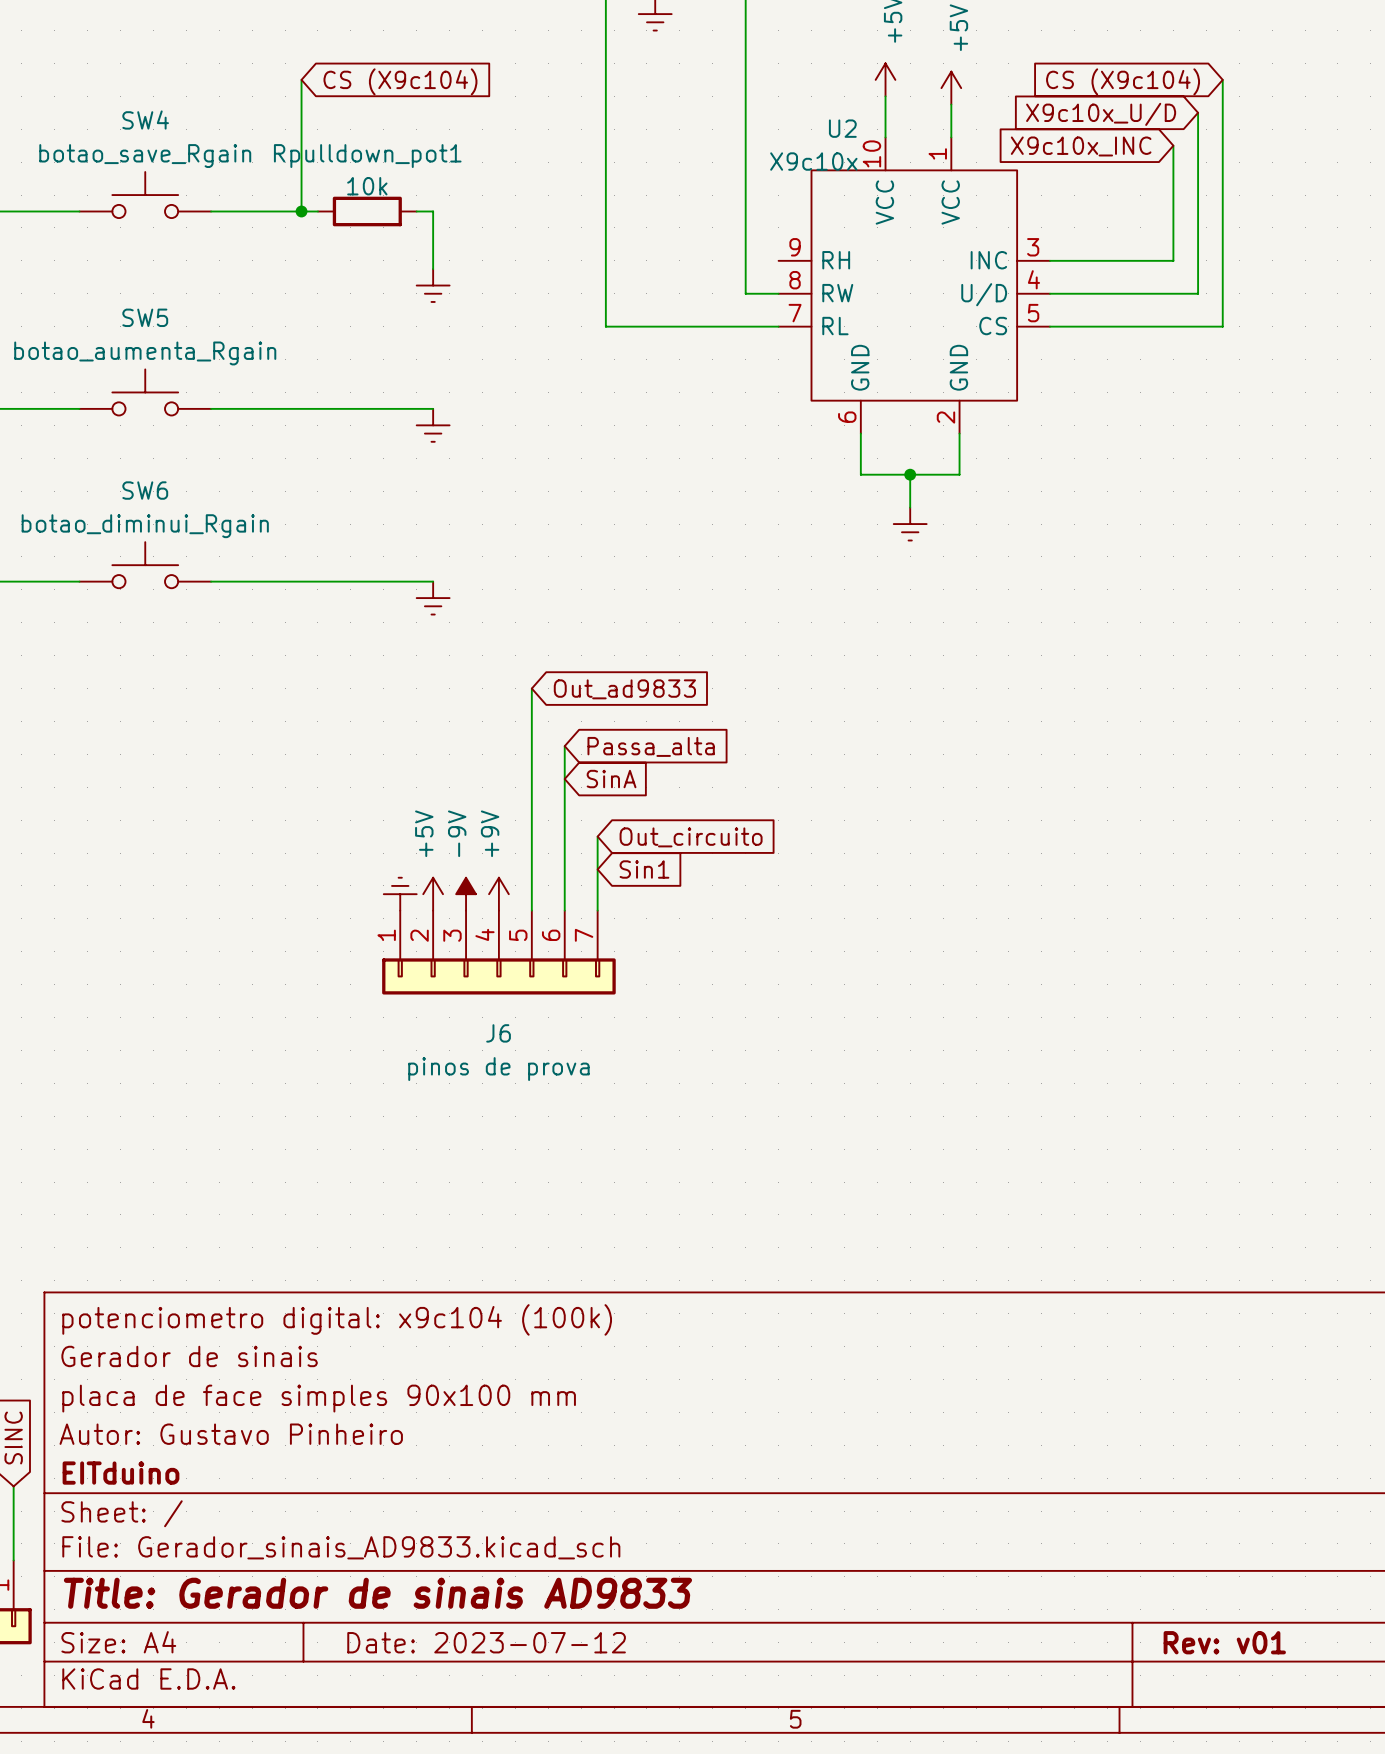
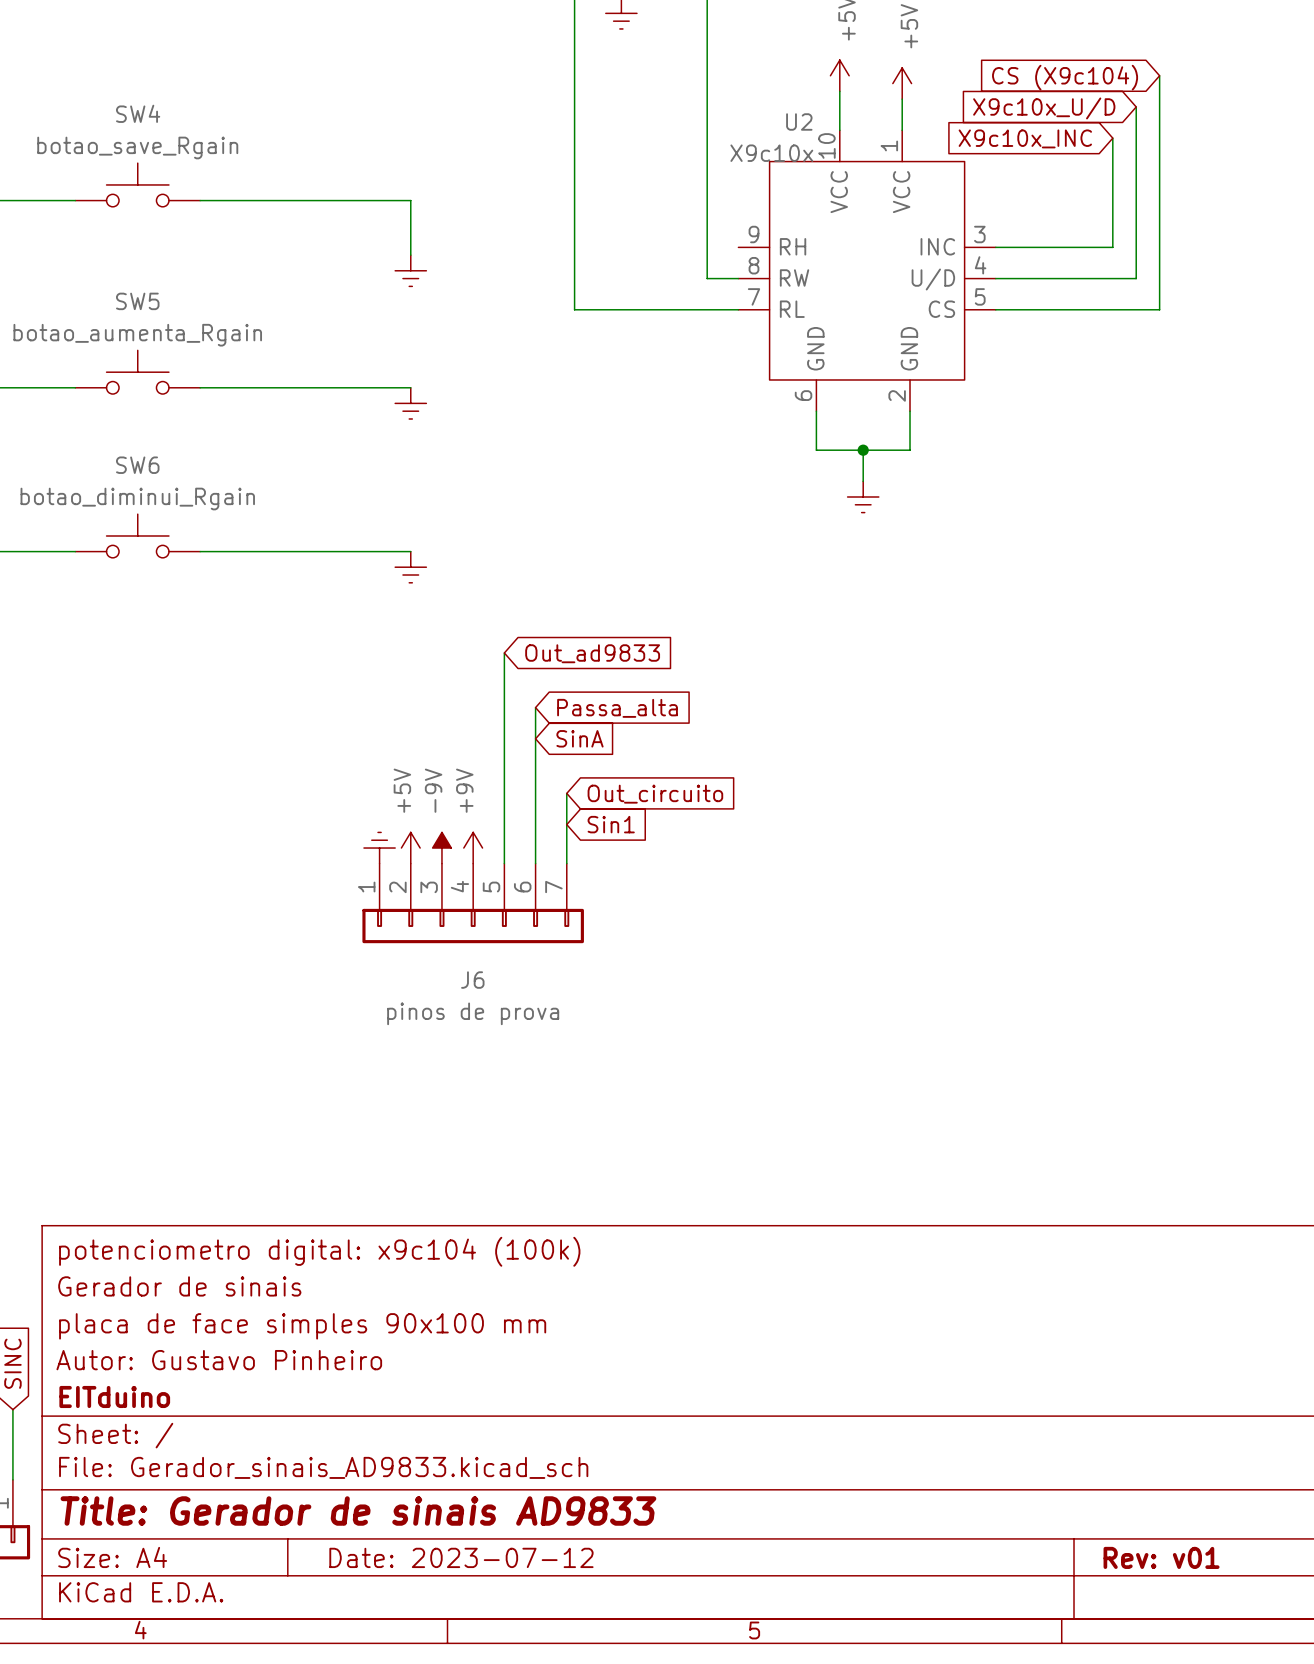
wire: (301, 79) (301, 211) -> none
global label: CS (X9c104) (400, 81) -> none
junction: (301, 211) -> none
wire: none -> (301, 200) (395, 200)
Rpulldown_pot1: 10k (367, 211) -> none

